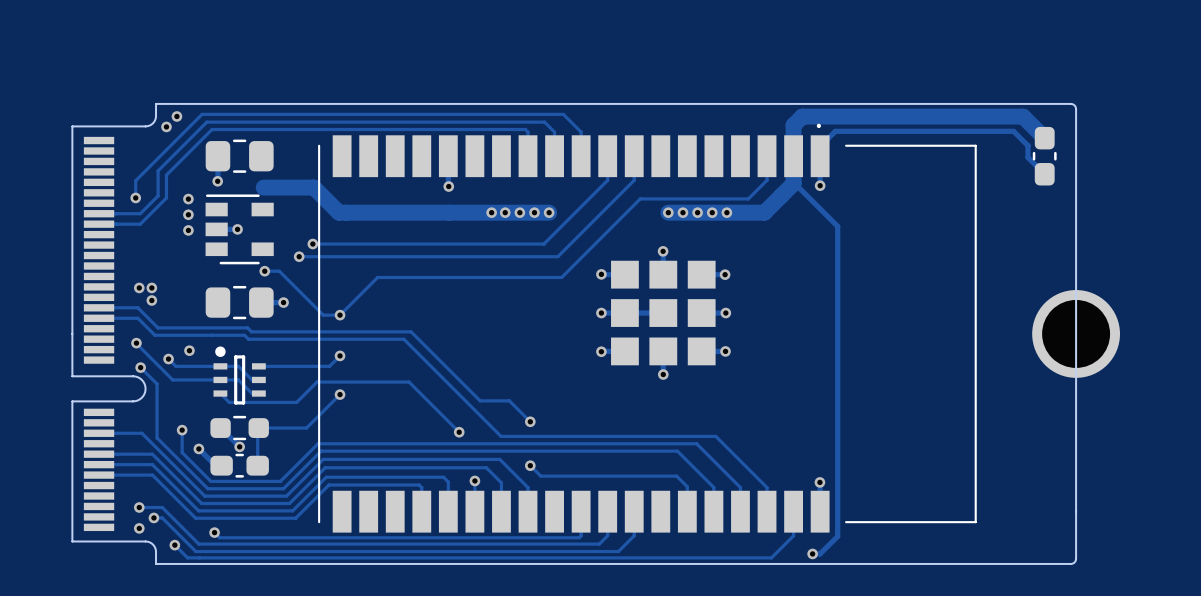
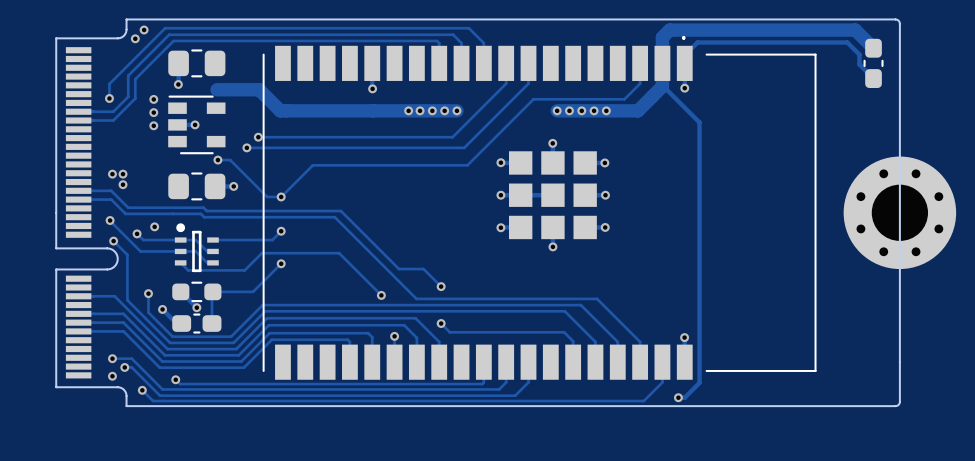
part footprint: [1032, 290, 1121, 378] -> [843, 156, 957, 270]

